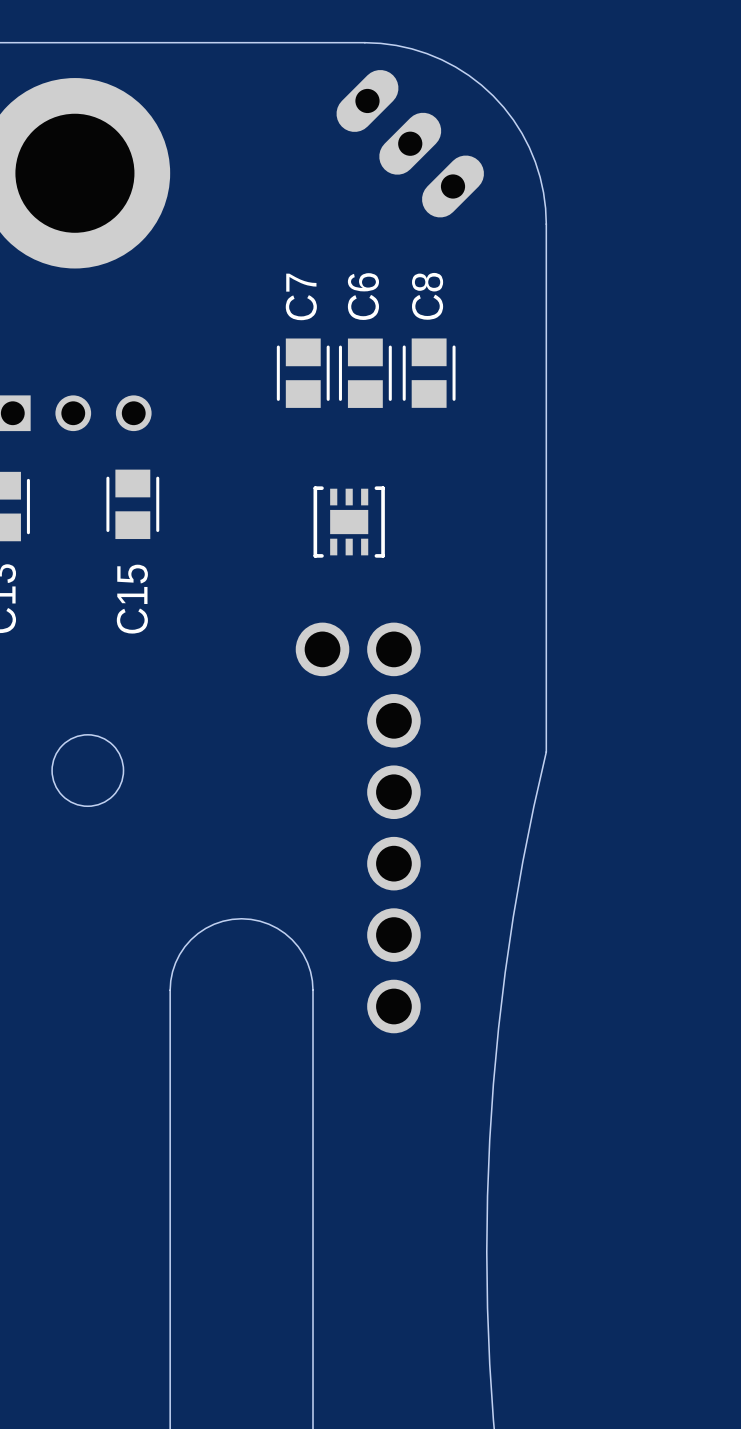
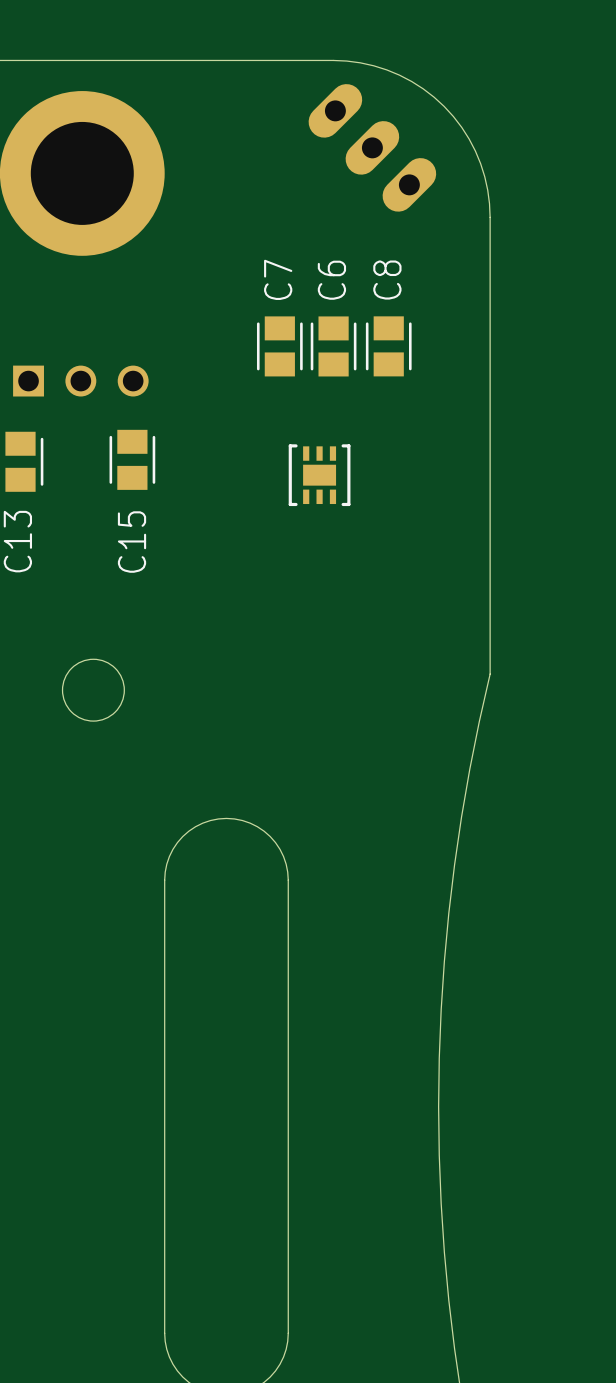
part: (322, 649) -> none
part: (393, 649) -> none
part: (393, 720) -> none
part: (393, 792) -> none
part: (393, 863) -> none
part: (393, 935) -> none
part: (393, 1006) -> none

